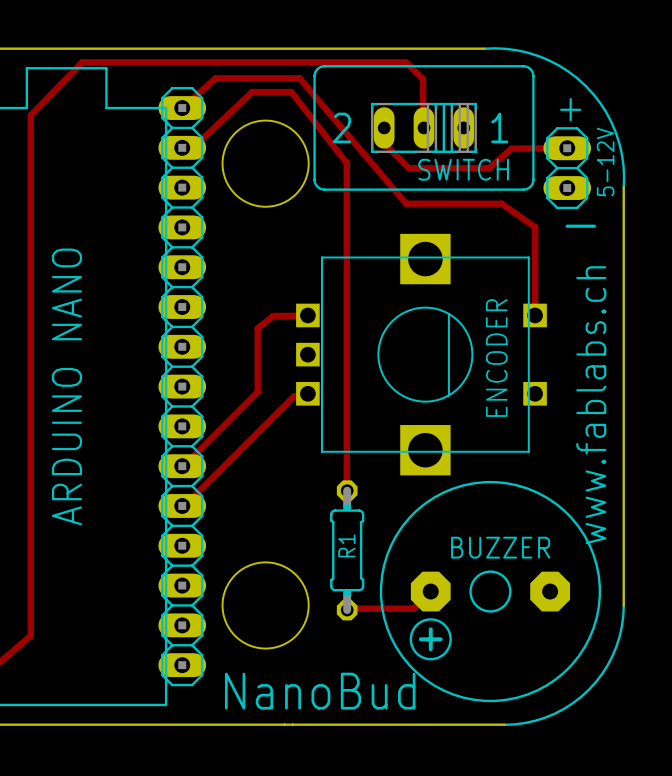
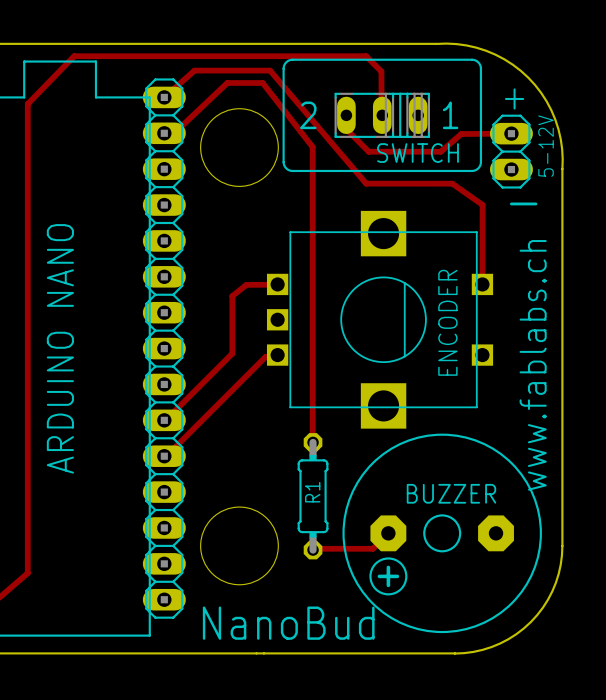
line: (484, 48) (517, 50) (539, 56) (568, 71) (585, 86) (606, 112) (615, 132) (623, 165) (623, 187) -> none
board edge: none -> (436, 43) (466, 45) (486, 50) (512, 64) (528, 77) (546, 101) (555, 119) (562, 149) (562, 169)
line: (623, 605) (619, 636) (612, 655) (602, 673) (588, 689) (572, 703) (554, 713) (535, 720) (504, 724) -> none
board edge: none -> (562, 545) (558, 573) (552, 591) (542, 607) (530, 622) (516, 634) (500, 643) (482, 649) (454, 653)

